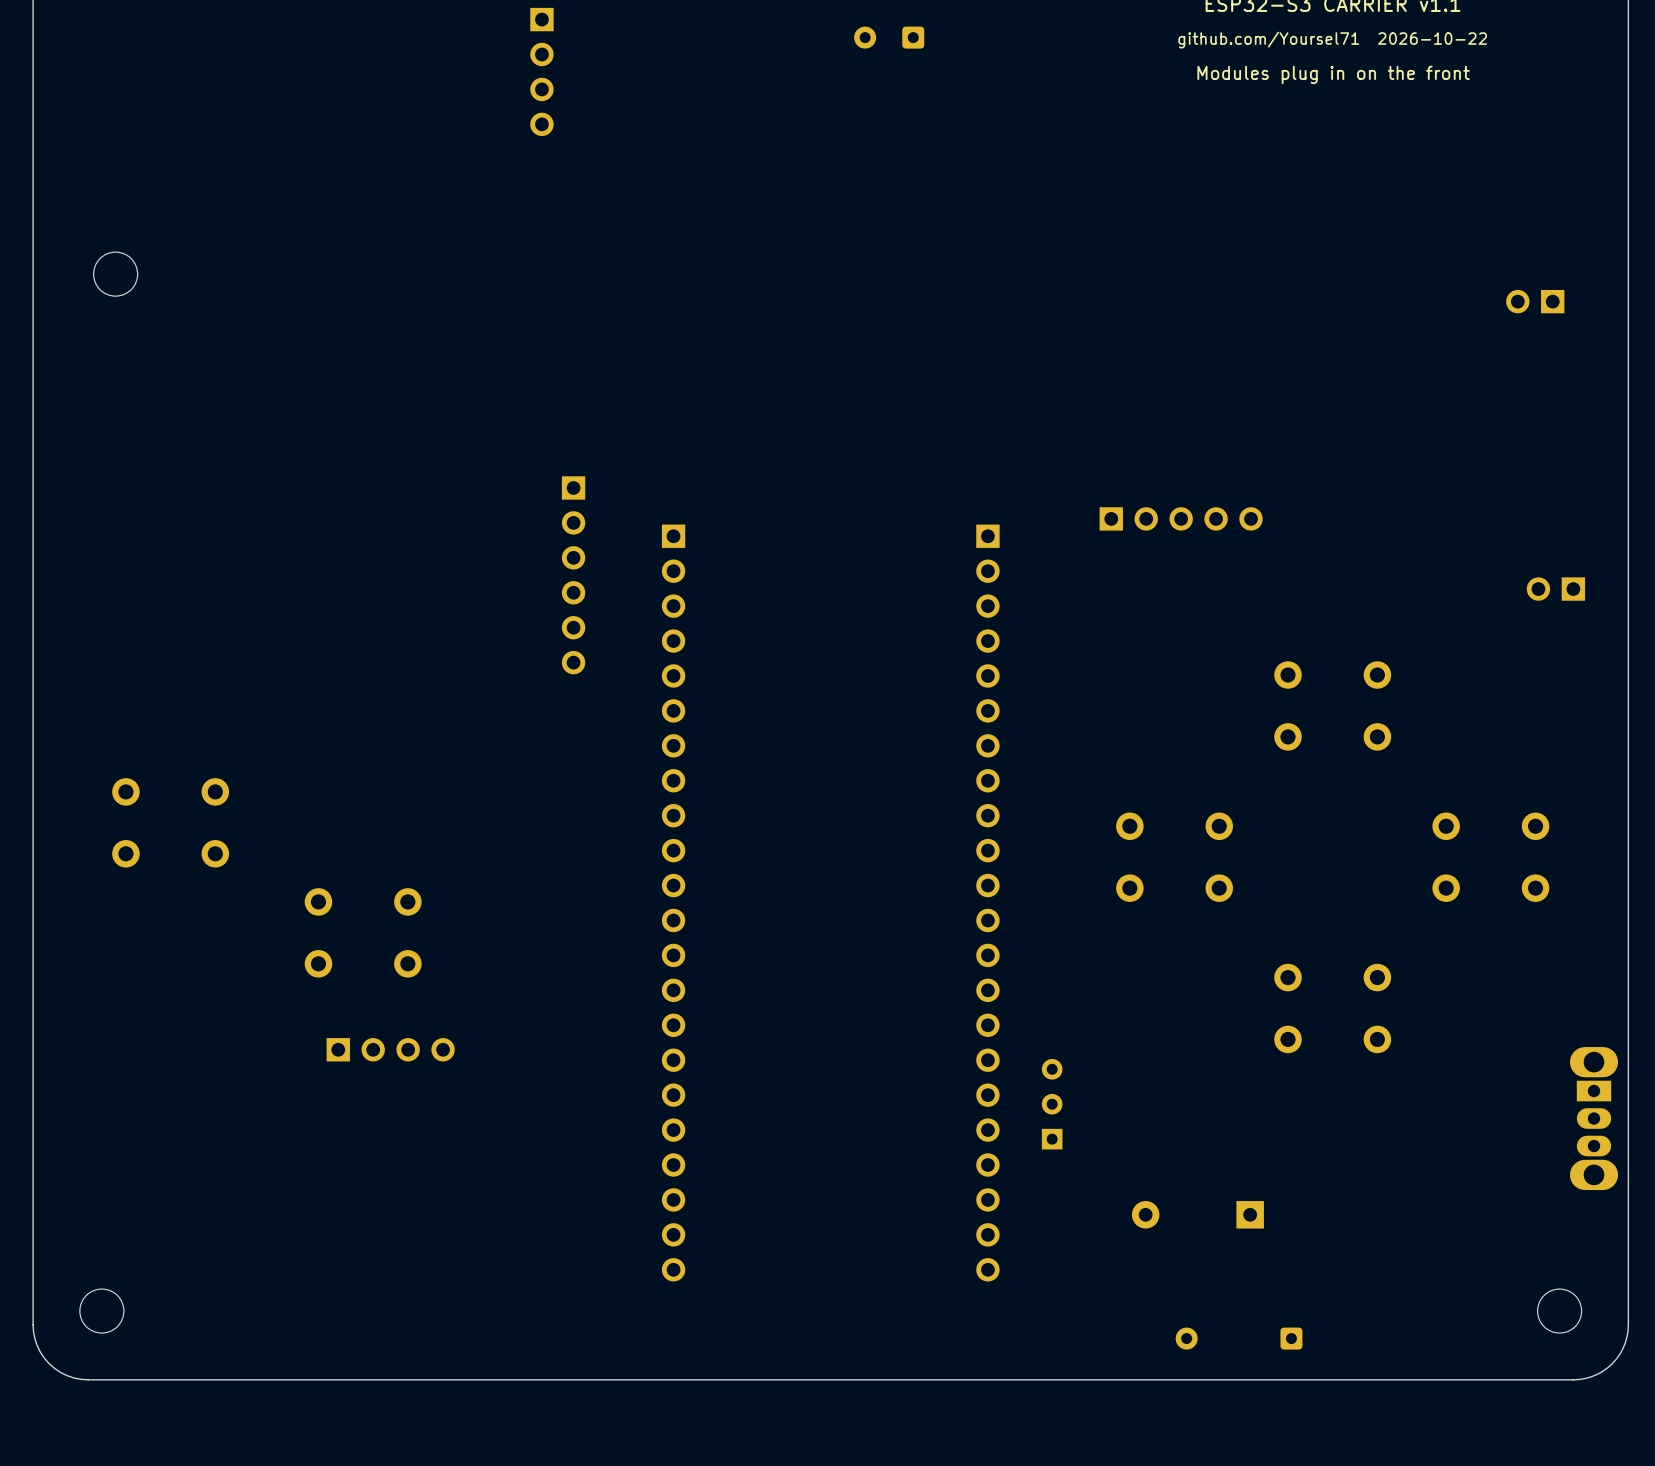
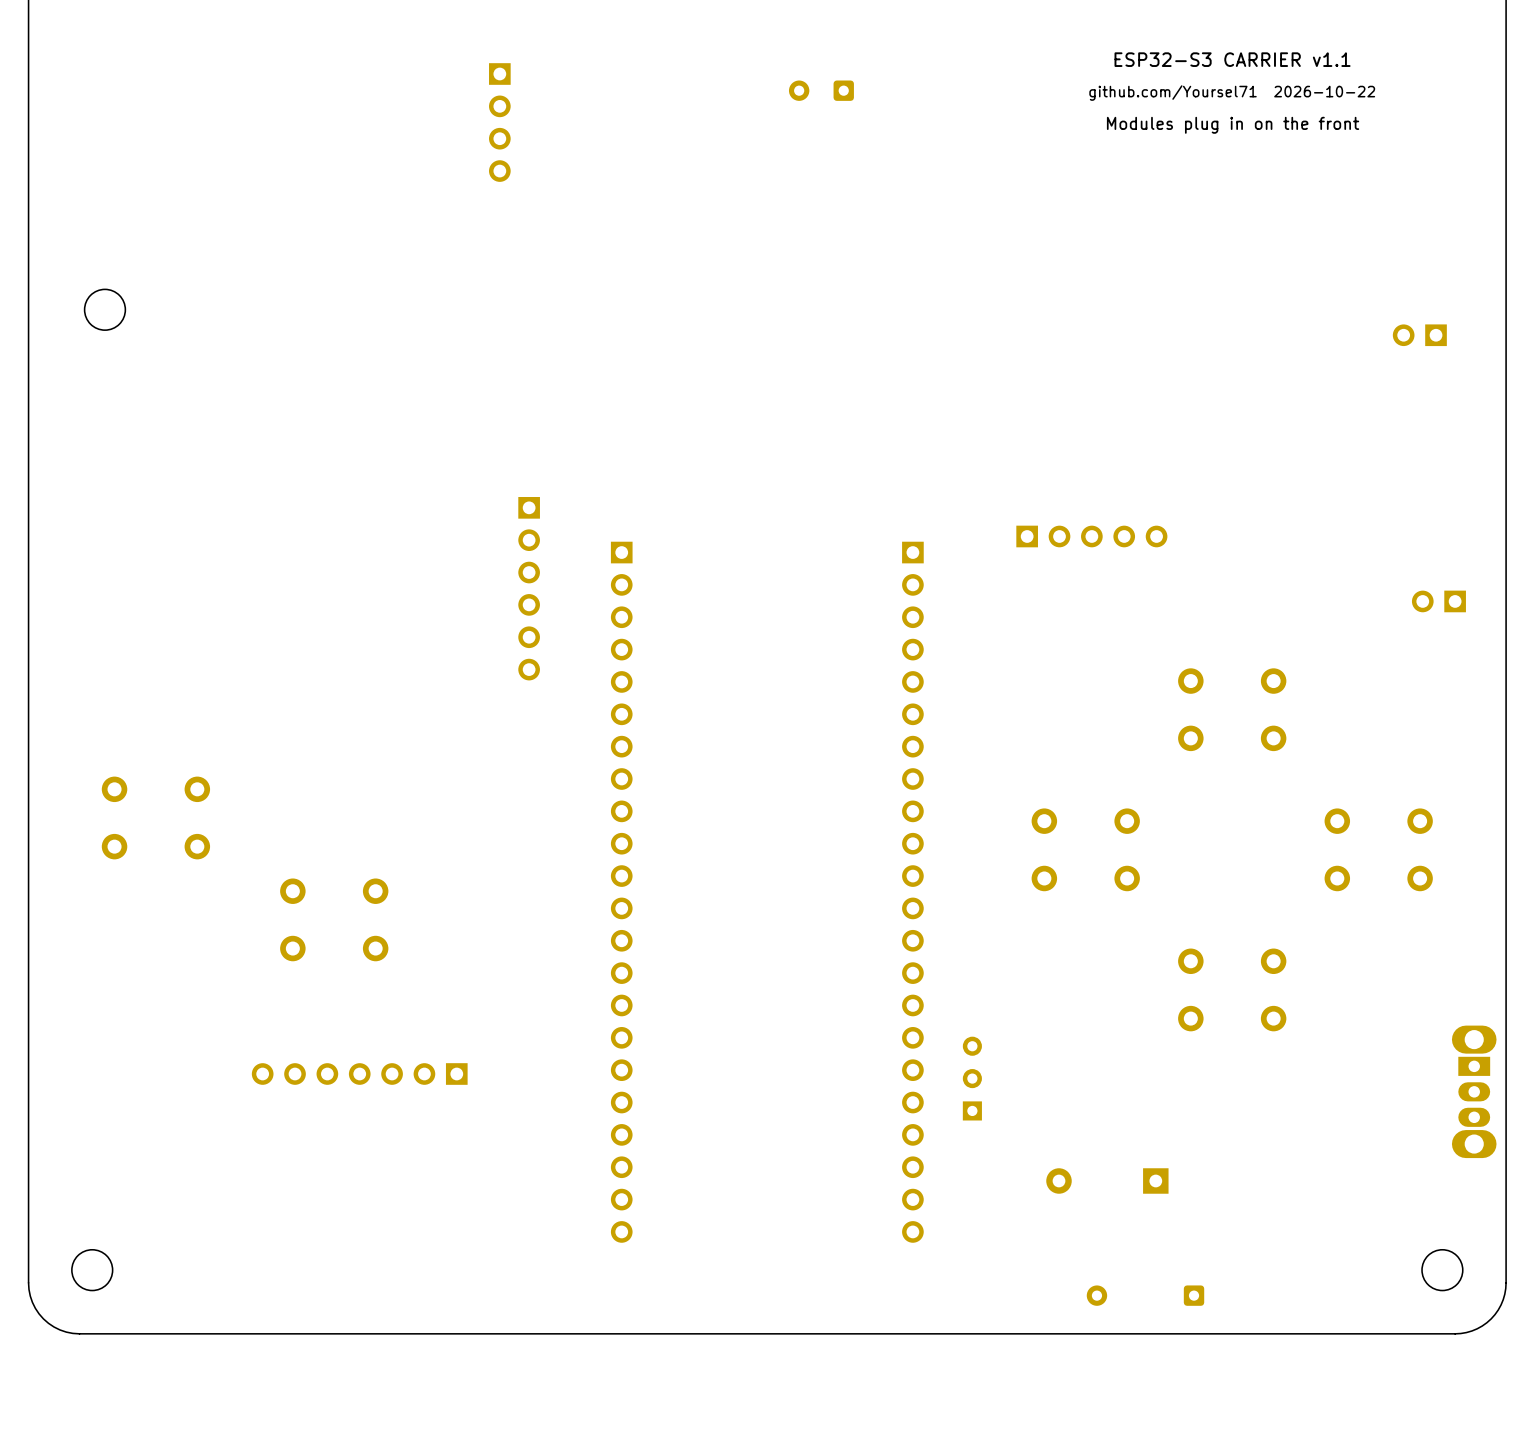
part: (390, 1049) -> none
part: none -> (359, 1074)

